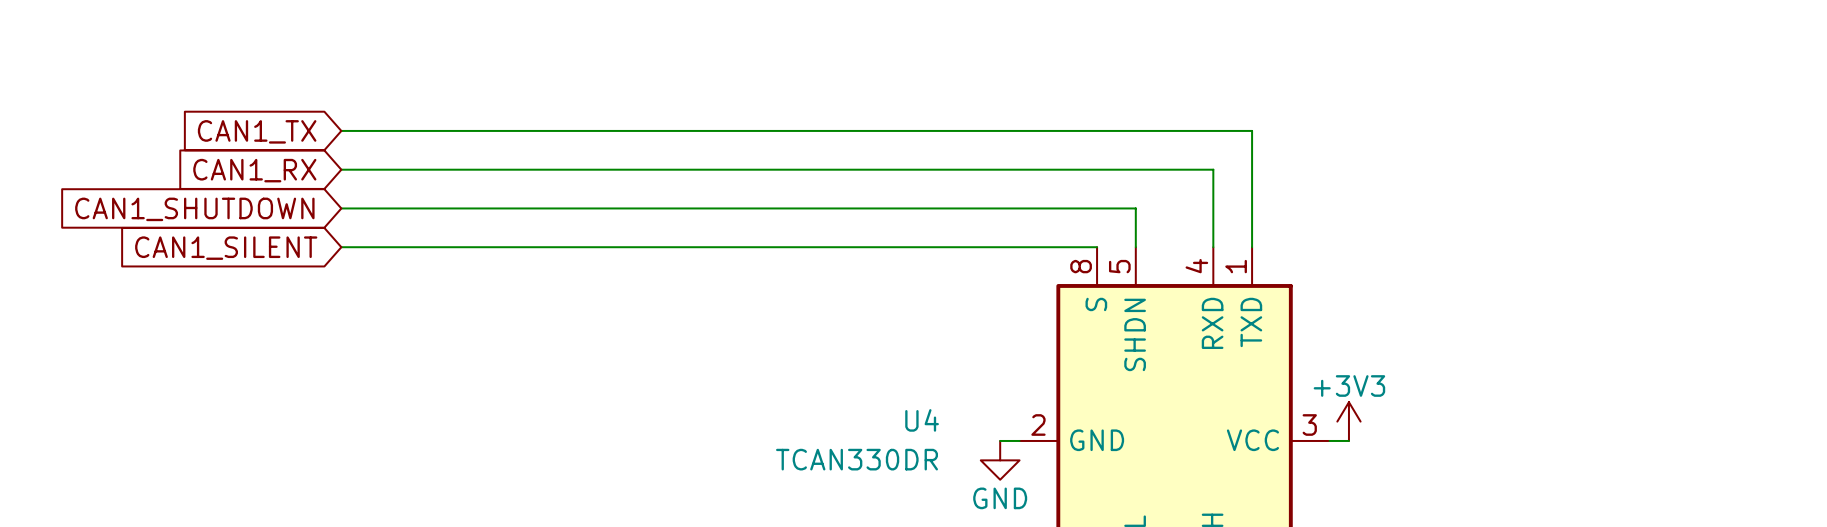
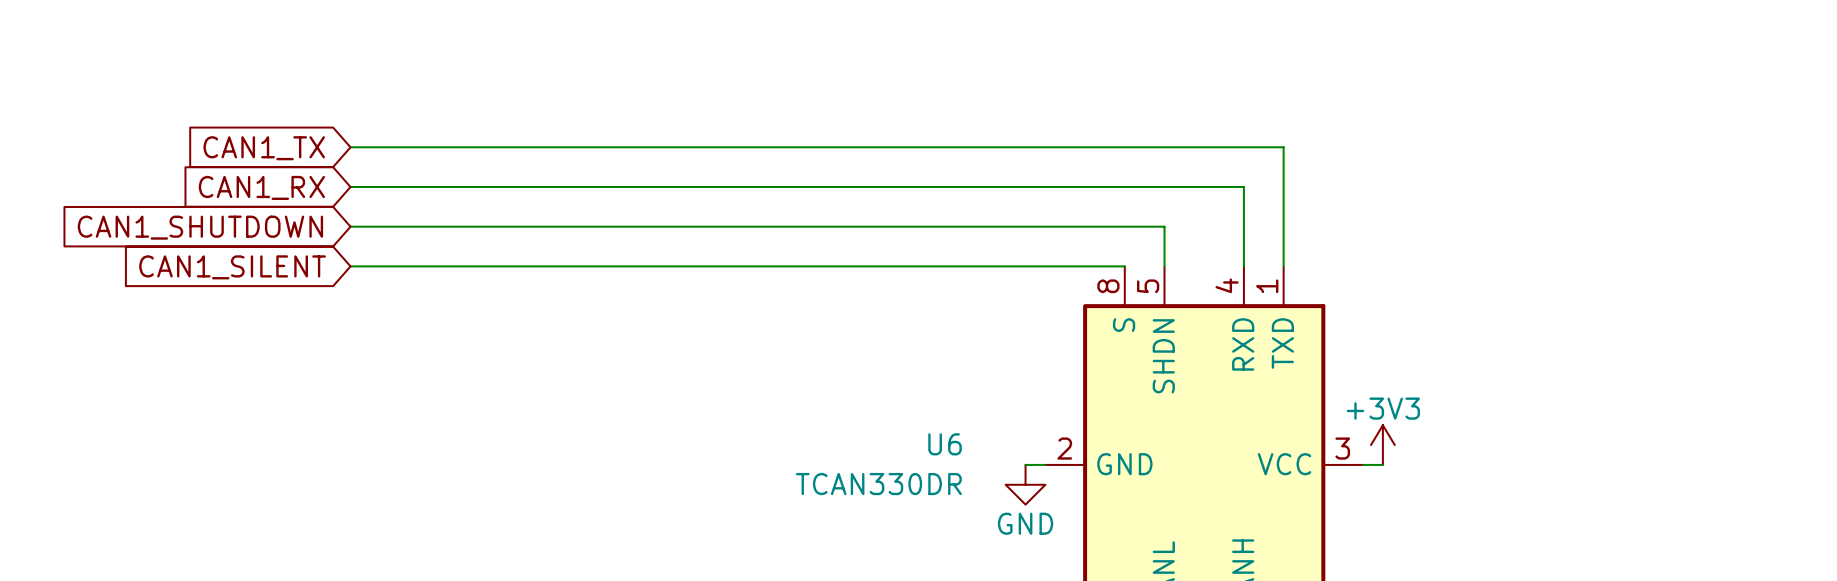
U4 name: U4 (922, 420) -> U6 (945, 444)

